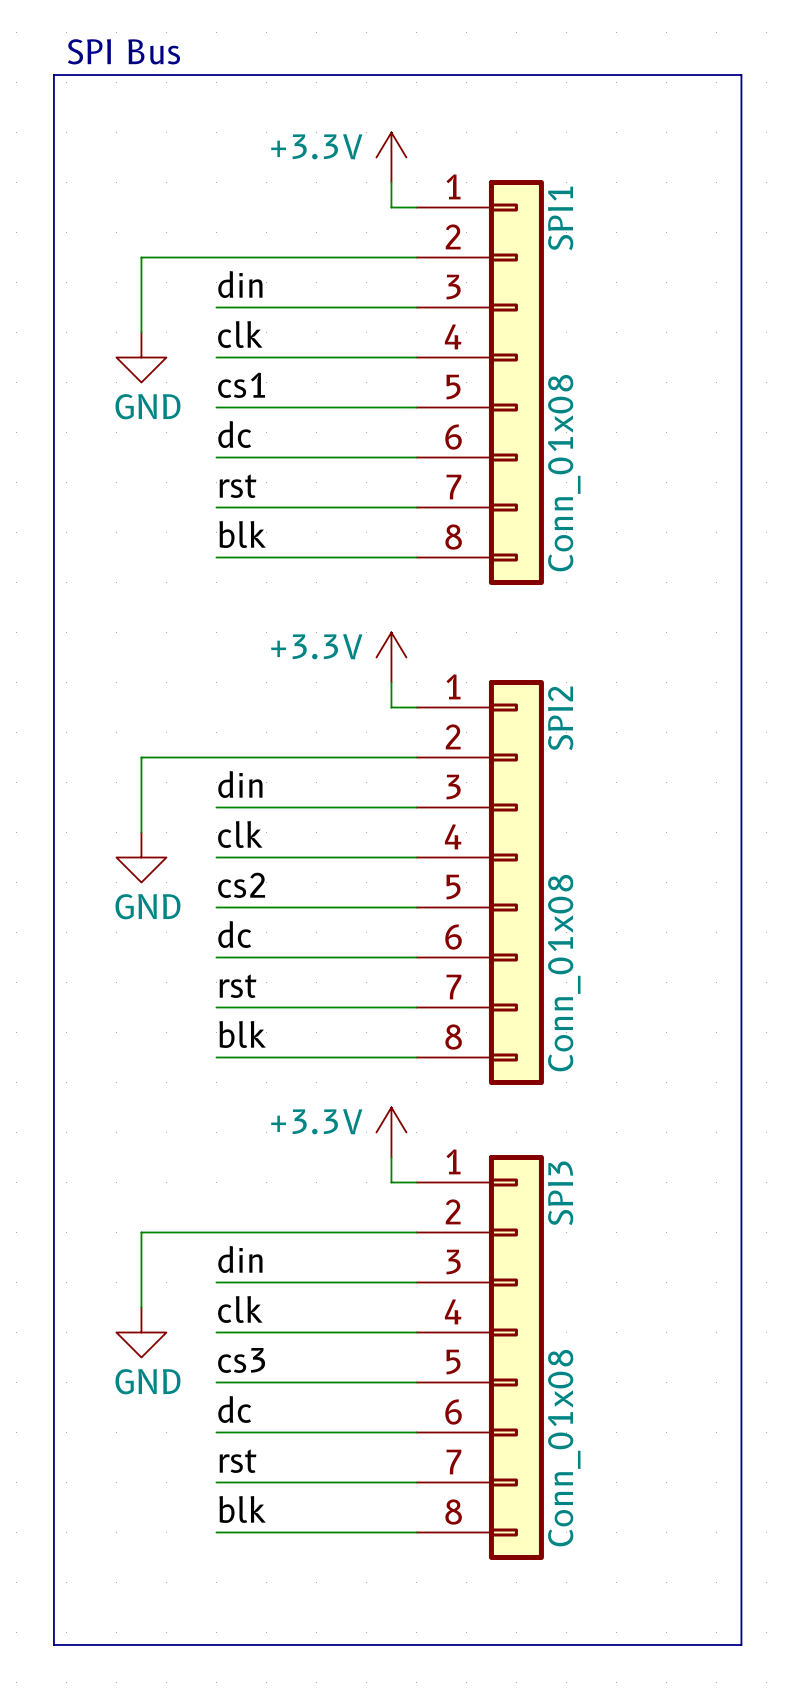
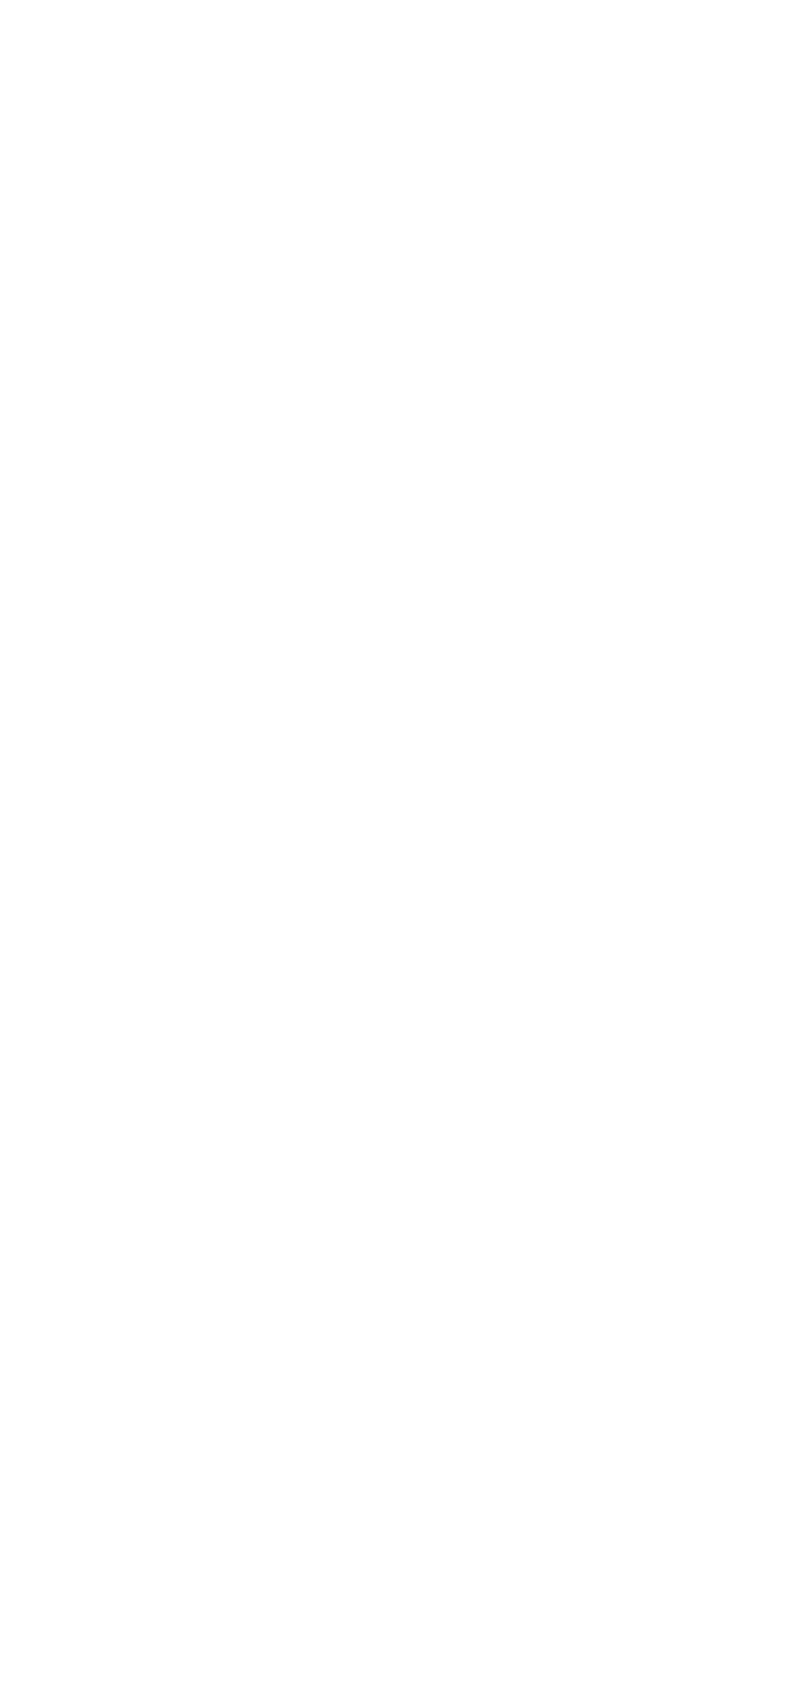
text: SPI Bus (123, 51) -> none
line: (53, 75) (741, 75) (741, 1644) (53, 1644) (53, 75) -> none
power symbol: +3.3V (391, 157) -> none
wire: (391, 182) (391, 207) (416, 207) -> none
wire: (416, 257) (141, 257) (141, 332) -> none
label: din (240, 284) -> none
wire: (216, 307) (416, 307) -> none
label: clk (240, 334) -> none
power symbol: GND (141, 357) -> none
wire: (216, 357) (416, 357) -> none
SPI1: Conn_01x08 (480, 382) -> none
label: cs1 (241, 385) -> none
wire: (216, 407) (416, 407) -> none
label: dc (234, 434) -> none
wire: (216, 457) (416, 457) -> none
label: rst (238, 486) -> none
wire: (216, 507) (416, 507) -> none
label: blk (242, 534) -> none
wire: (216, 557) (416, 557) -> none
power symbol: +3.3V (391, 657) -> none
wire: (391, 682) (391, 707) (416, 707) -> none
wire: (416, 757) (141, 757) (141, 832) -> none
label: din (240, 784) -> none
wire: (216, 807) (416, 807) -> none
label: clk (240, 834) -> none
power symbol: GND (141, 857) -> none
wire: (216, 857) (416, 857) -> none
SPI2: Conn_01x08 (480, 882) -> none
label: cs2 (241, 885) -> none
wire: (216, 907) (416, 907) -> none
label: dc (234, 934) -> none
wire: (216, 957) (416, 957) -> none
label: rst (238, 986) -> none
wire: (216, 1007) (416, 1007) -> none
label: blk (242, 1034) -> none
wire: (216, 1057) (416, 1057) -> none
power symbol: +3.3V (391, 1132) -> none
wire: (391, 1157) (391, 1182) (416, 1182) -> none
wire: (416, 1232) (141, 1232) (141, 1307) -> none
label: din (240, 1259) -> none
wire: (216, 1282) (416, 1282) -> none
label: clk (240, 1309) -> none
power symbol: GND (141, 1332) -> none
wire: (216, 1332) (416, 1332) -> none
SPI3: Conn_01x08 (480, 1357) -> none
label: cs3 (241, 1360) -> none
wire: (216, 1382) (416, 1382) -> none
label: dc (234, 1409) -> none
wire: (216, 1432) (416, 1432) -> none
label: rst (238, 1461) -> none
wire: (216, 1482) (416, 1482) -> none
label: blk (242, 1509) -> none
wire: (216, 1532) (416, 1532) -> none

